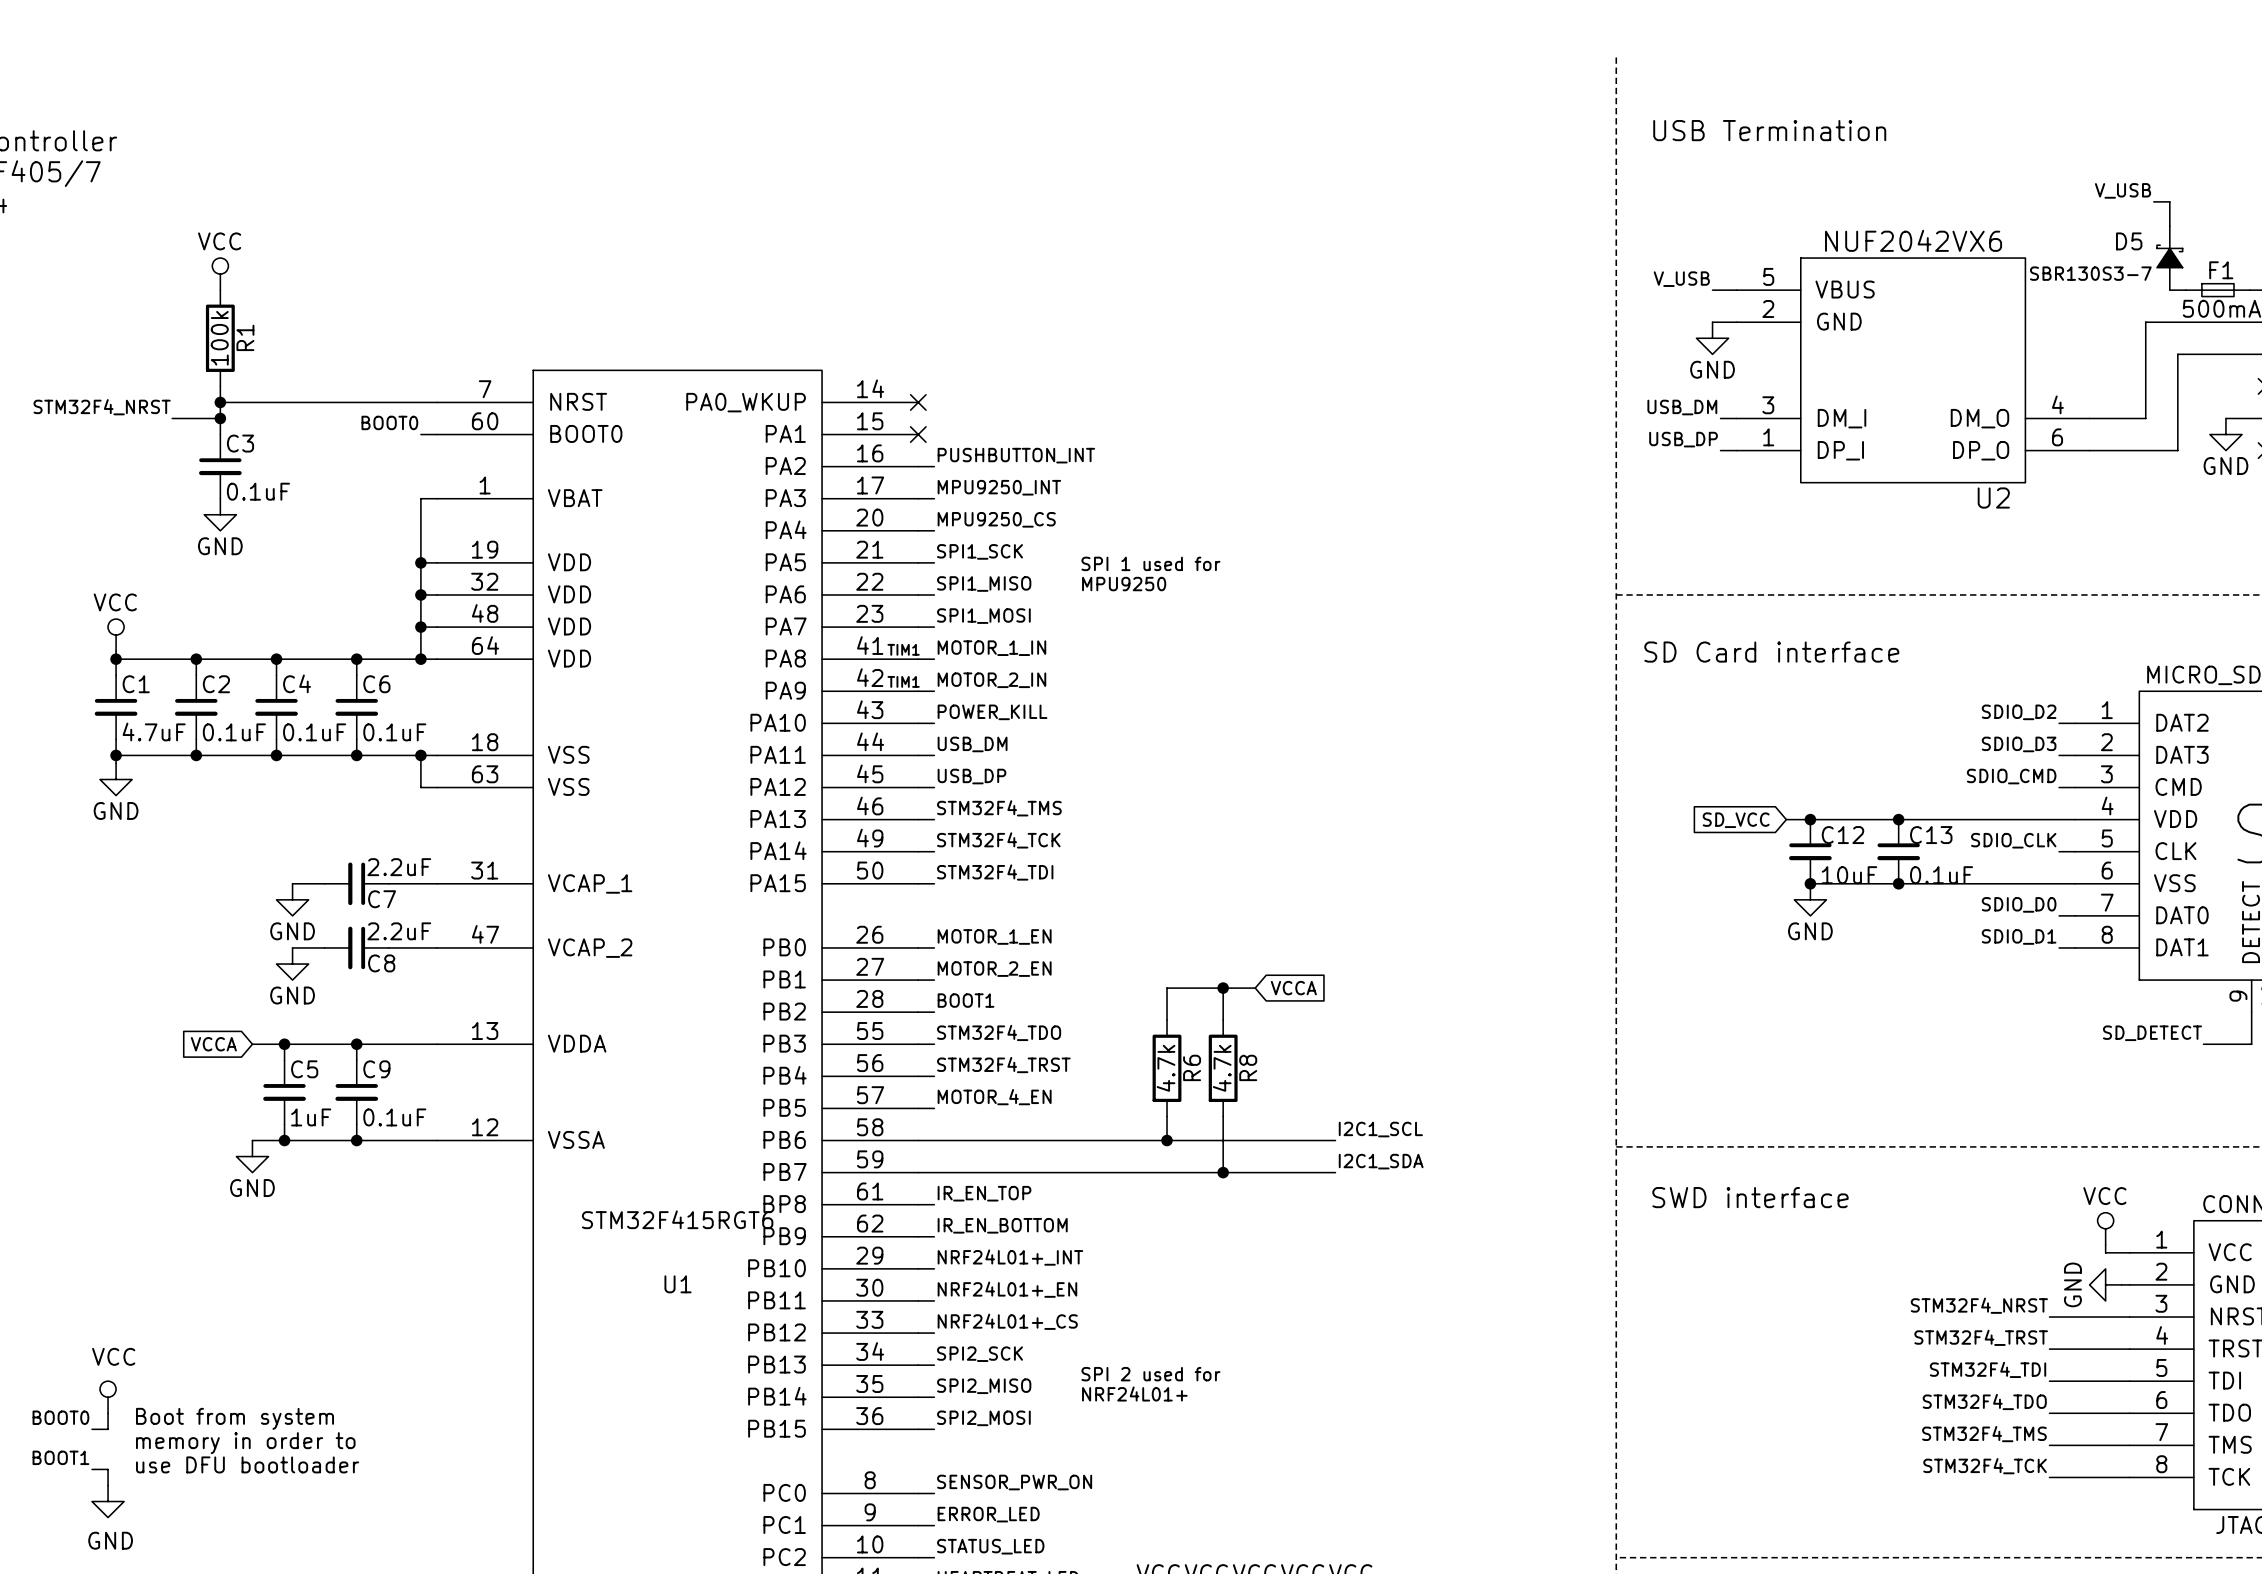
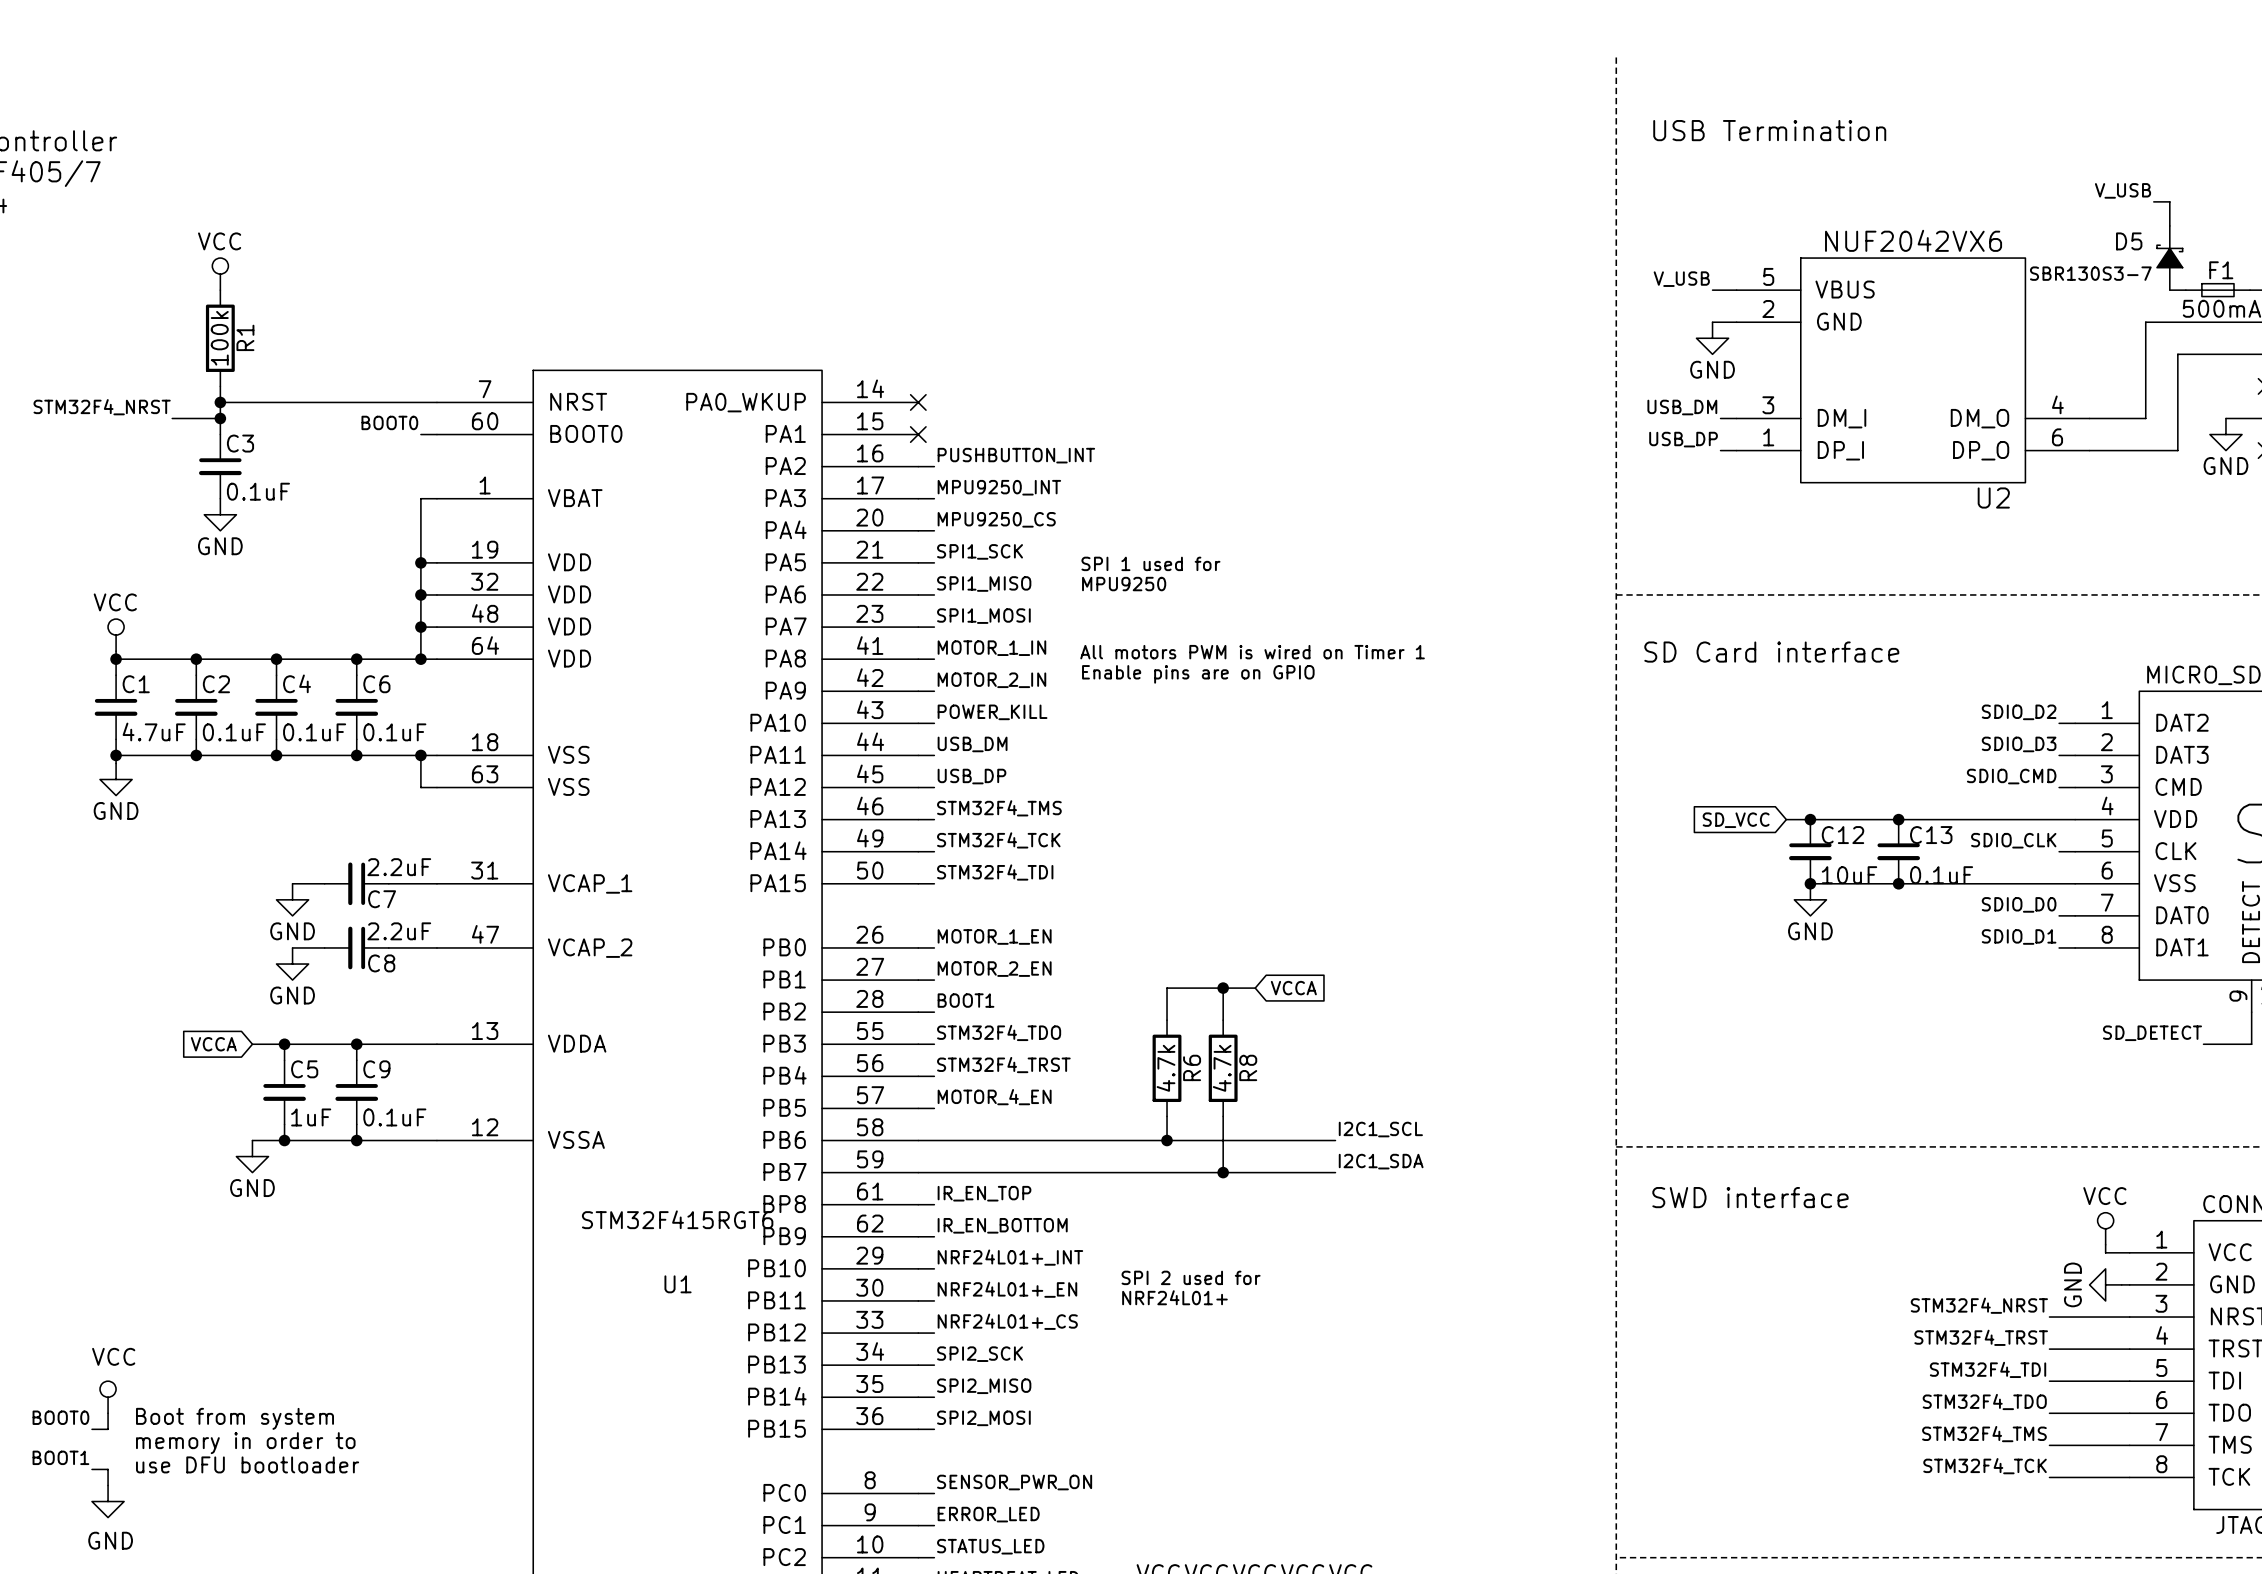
text: TIM1 (903, 649) -> none
text: none -> All motors PWM is wired on Timer 1 (1252, 652)
text: none -> Enable pins are on GPIO (1198, 674)
text: TIM1 (903, 681) -> none
text position: SPI 2 used for (1150, 1374) -> SPI 2 used for (1191, 1277)
text position: NRF24L01+ (1134, 1394) -> NRF24L01+ (1174, 1297)

